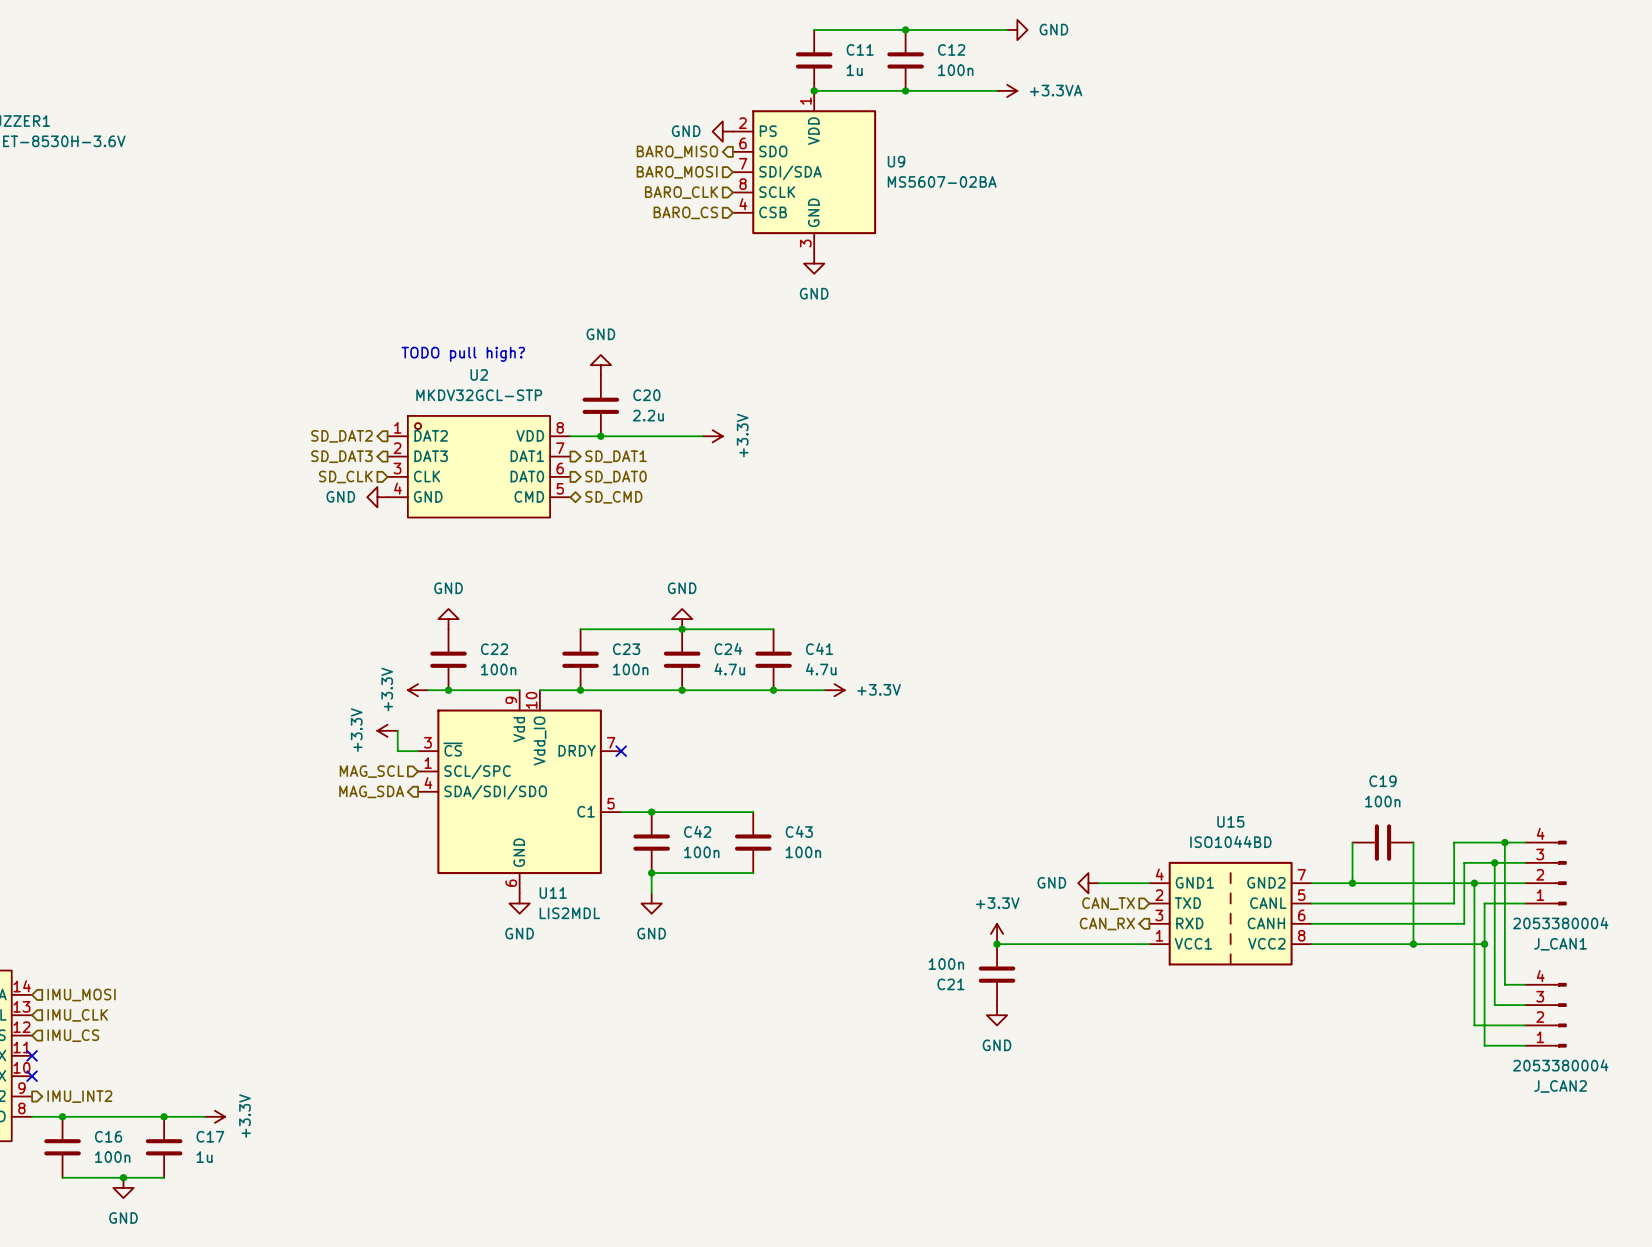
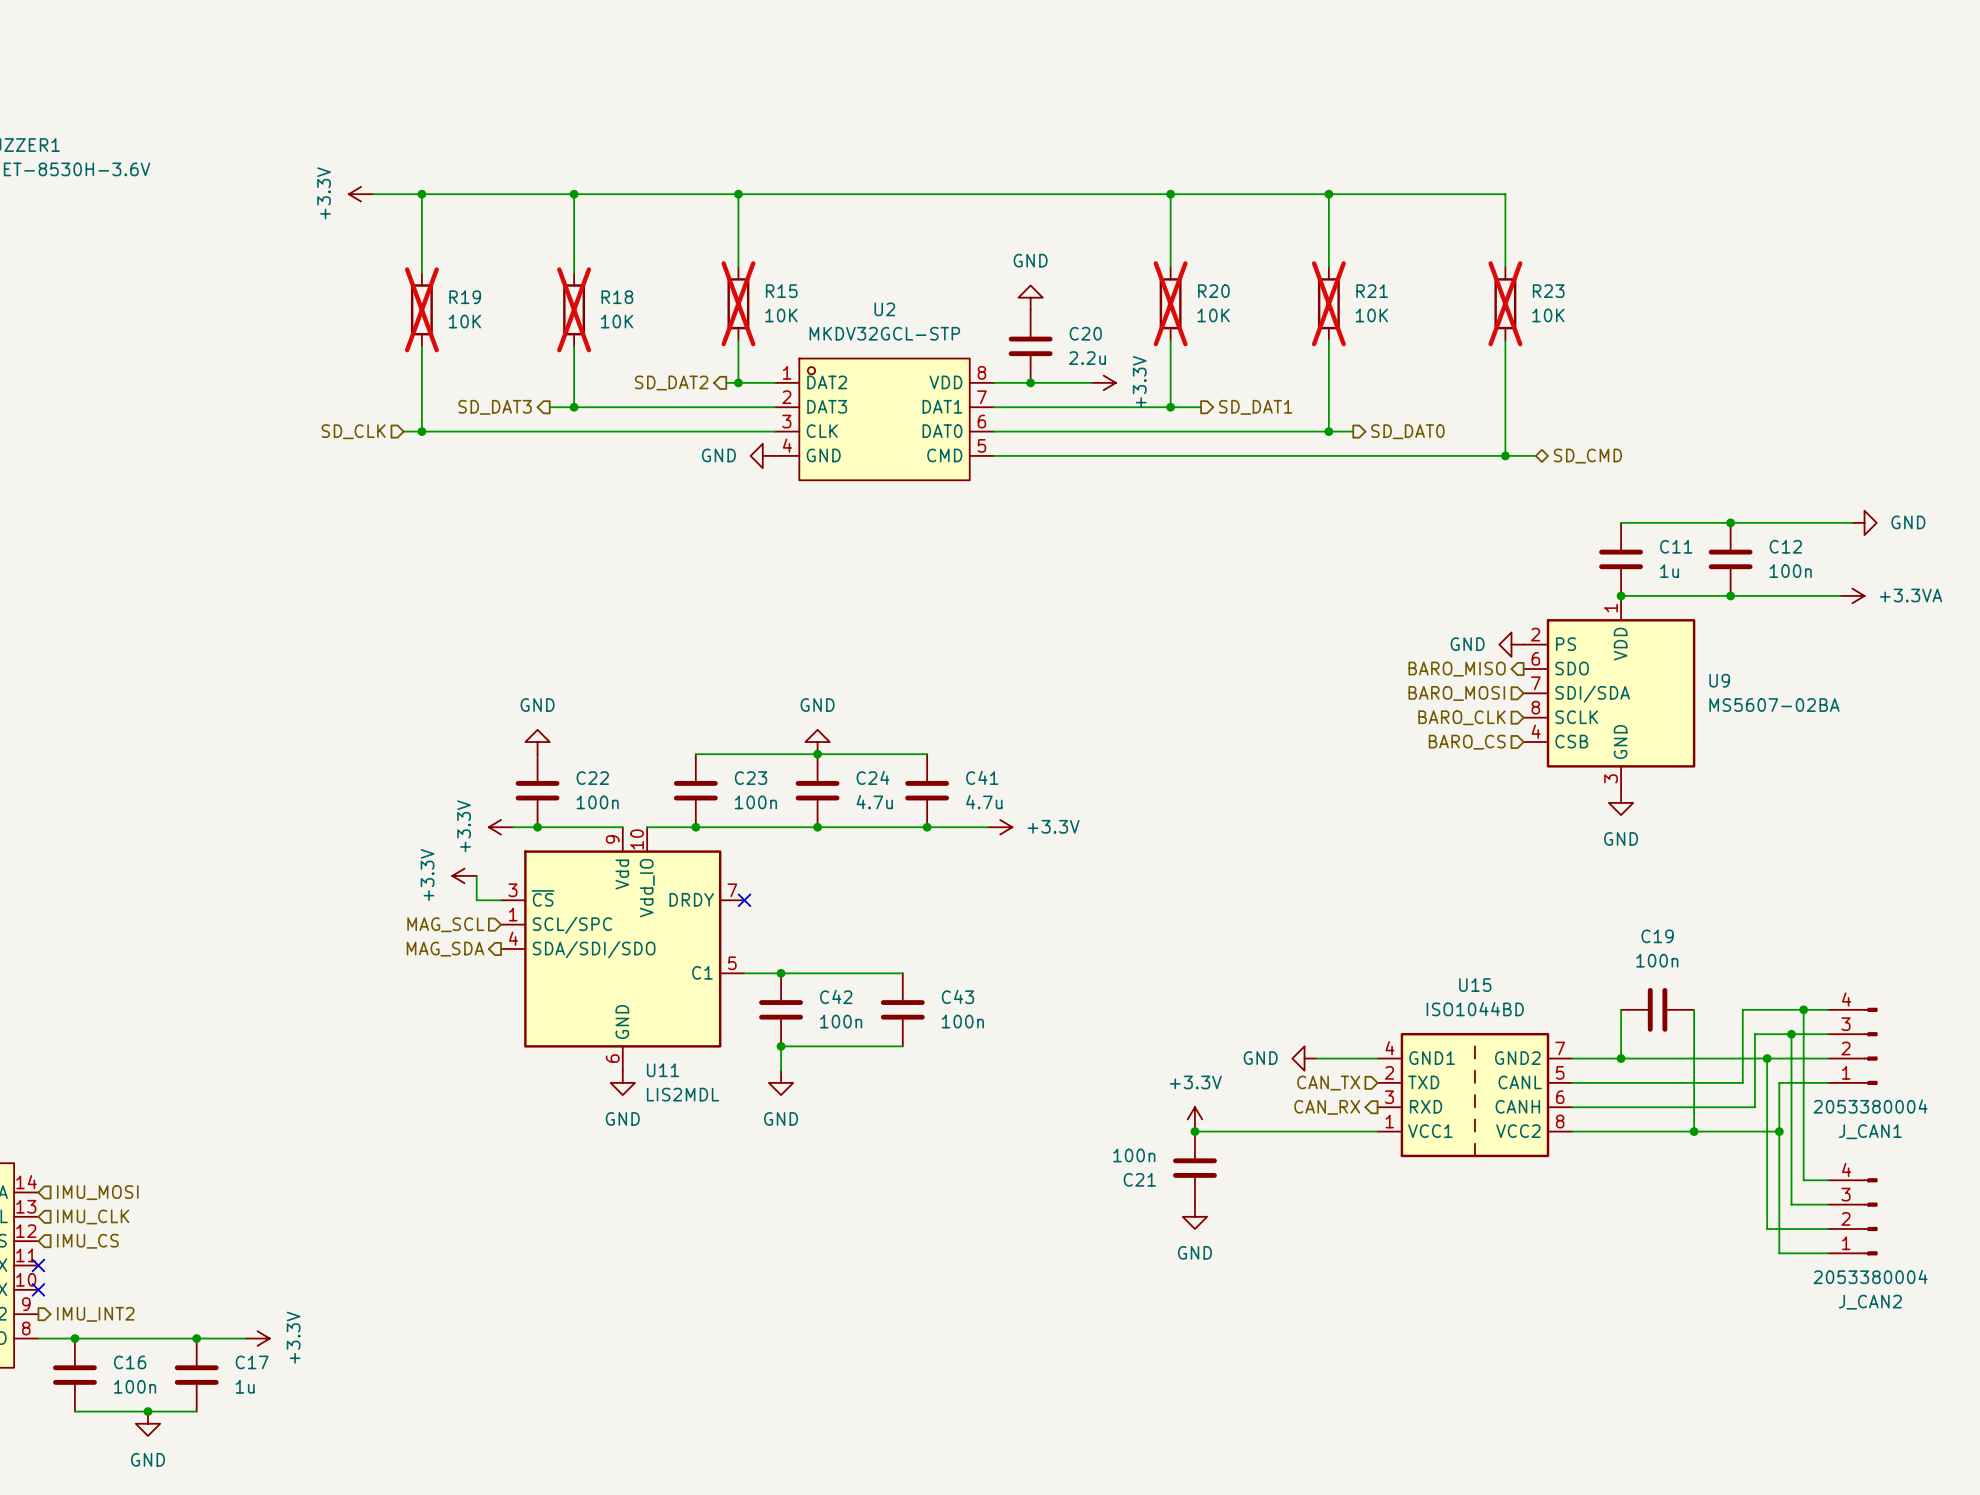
wire: (814, 29) (1007, 29) -> none
junction: (905, 29) -> none
power symbol: GND (1017, 29) -> none
C11 position: (814, 60) -> (1621, 559)
C12 position: (905, 60) -> (1730, 559)
wire: (814, 90) (997, 90) -> none
junction: (814, 90) -> none
junction: (905, 90) -> none
power symbol: +3.3VA (1007, 90) -> none
power symbol: GND (722, 131) -> none
hierarchical label: BARO_MISO (677, 151) -> none
power symbol: none -> +3.3V (361, 194)
wire: none -> (373, 194) (1505, 194) (1505, 267)
wire: none -> (421, 194) (421, 273)
junction: none -> (421, 194)
wire: none -> (574, 194) (574, 273)
junction: none -> (574, 194)
wire: none -> (738, 194) (738, 267)
junction: none -> (738, 194)
wire: none -> (1170, 194) (1170, 267)
junction: none -> (1170, 194)
wire: none -> (1328, 194) (1328, 267)
junction: none -> (1328, 194)
hierarchical label: BARO_MOSI (677, 172) -> none
U9 position: (804, 172) -> (1609, 693)
hierarchical label: BARO_CLK (681, 192) -> none
hierarchical label: BARO_CS (685, 212) -> none
R15: none -> 10K (738, 303)
R20: none -> 10K (1170, 303)
R21: none -> 10K (1328, 303)
R23: none -> 10K (1505, 303)
R19: none -> 10K (421, 309)
R18: none -> 10K (574, 309)
power symbol rotation: 0° (814, 263) -> 180° (1030, 297)
power symbol position: GND (814, 263) -> GND (1030, 297)
wire: none -> (738, 340) (738, 382)
wire: none -> (1170, 340) (1170, 407)
wire: none -> (1328, 340) (1328, 431)
wire: none -> (1505, 340) (1505, 455)
wire: none -> (421, 346) (421, 431)
wire: none -> (574, 346) (574, 407)
hierarchical label: none -> SD_DAT2 (671, 383)
wire: none -> (726, 382) (774, 382)
junction: none -> (738, 382)
wire: none -> (994, 382) (1091, 382)
junction: none -> (1030, 382)
power symbol: none -> +3.3V (1103, 382)
wire: none -> (549, 407) (774, 407)
junction: none -> (574, 407)
wire: none -> (994, 407) (1201, 407)
junction: none -> (1170, 407)
hierarchical label: none -> SD_DAT1 (1255, 407)
text: TODO pull high? (463, 354) -> none
wire: none -> (403, 431) (774, 431)
junction: none -> (421, 431)
wire: none -> (994, 431) (1353, 431)
junction: none -> (1328, 431)
hierarchical label: none -> SD_DAT0 (1407, 431)
power symbol rotation: 0° (600, 365) -> 90° counterclockwise (762, 455)
power symbol position: GND (600, 365) -> GND (762, 455)
wire: none -> (994, 455) (1535, 455)
junction: none -> (1505, 455)
hierarchical label: none -> SD_CMD (1587, 456)
C20 position: (600, 405) -> (1030, 346)
hierarchical label: SD_DAT2 (341, 436) -> none
wire: (570, 436) (702, 436) -> none
junction: (600, 436) -> none
power symbol: +3.3V (712, 436) -> none
wire: none -> (1621, 522) (1852, 522)
junction: none -> (1730, 522)
power symbol: none -> GND (1864, 522)
hierarchical label position: SD_DAT3 (341, 456) -> SD_DAT3 (495, 407)
hierarchical label: SD_DAT1 (616, 456) -> none
U2 position: (478, 466) -> (884, 419)
hierarchical label position: SD_CLK (345, 477) -> SD_CLK (353, 431)
hierarchical label: SD_DAT0 (616, 477) -> none
power symbol: GND (377, 497) -> none
hierarchical label: SD_CMD (613, 497) -> none
wire: none -> (1621, 595) (1840, 595)
junction: none -> (1621, 595)
junction: none -> (1730, 595)
power symbol: none -> +3.3VA (1852, 595)
power symbol: none -> GND (1511, 644)
hierarchical label: none -> BARO_MISO (1457, 669)
hierarchical label: none -> BARO_MOSI (1456, 693)
hierarchical label: none -> BARO_CLK (1462, 717)
hierarchical label: none -> BARO_CS (1467, 742)
power symbol: none -> GND (1621, 802)

